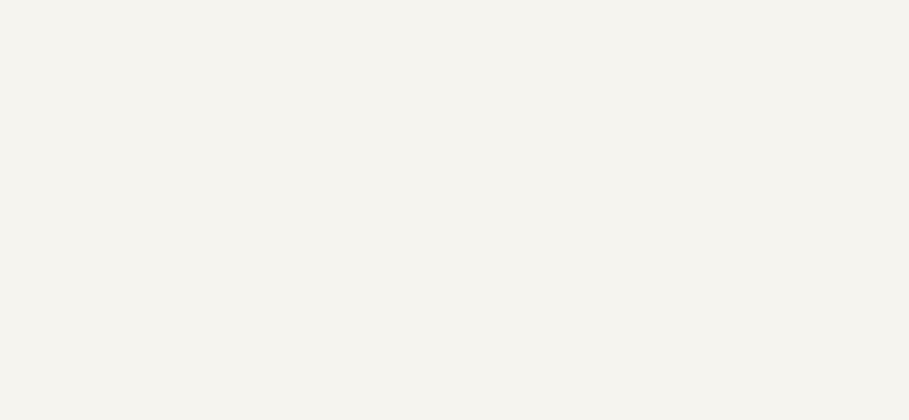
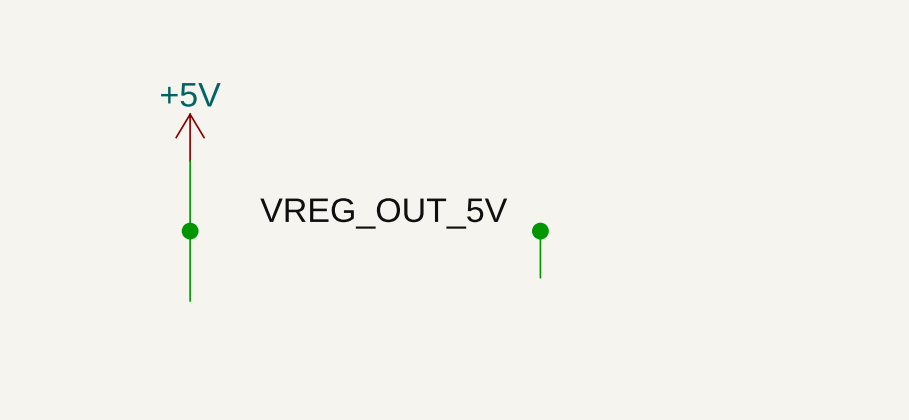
power symbol: none -> +5V (190, 137)
wire: none -> (190, 161) (190, 301)
label: none -> VREG_OUT_5V (383, 213)
junction: none -> (190, 231)
wire: none -> (540, 231) (540, 277)
junction: none -> (540, 231)

